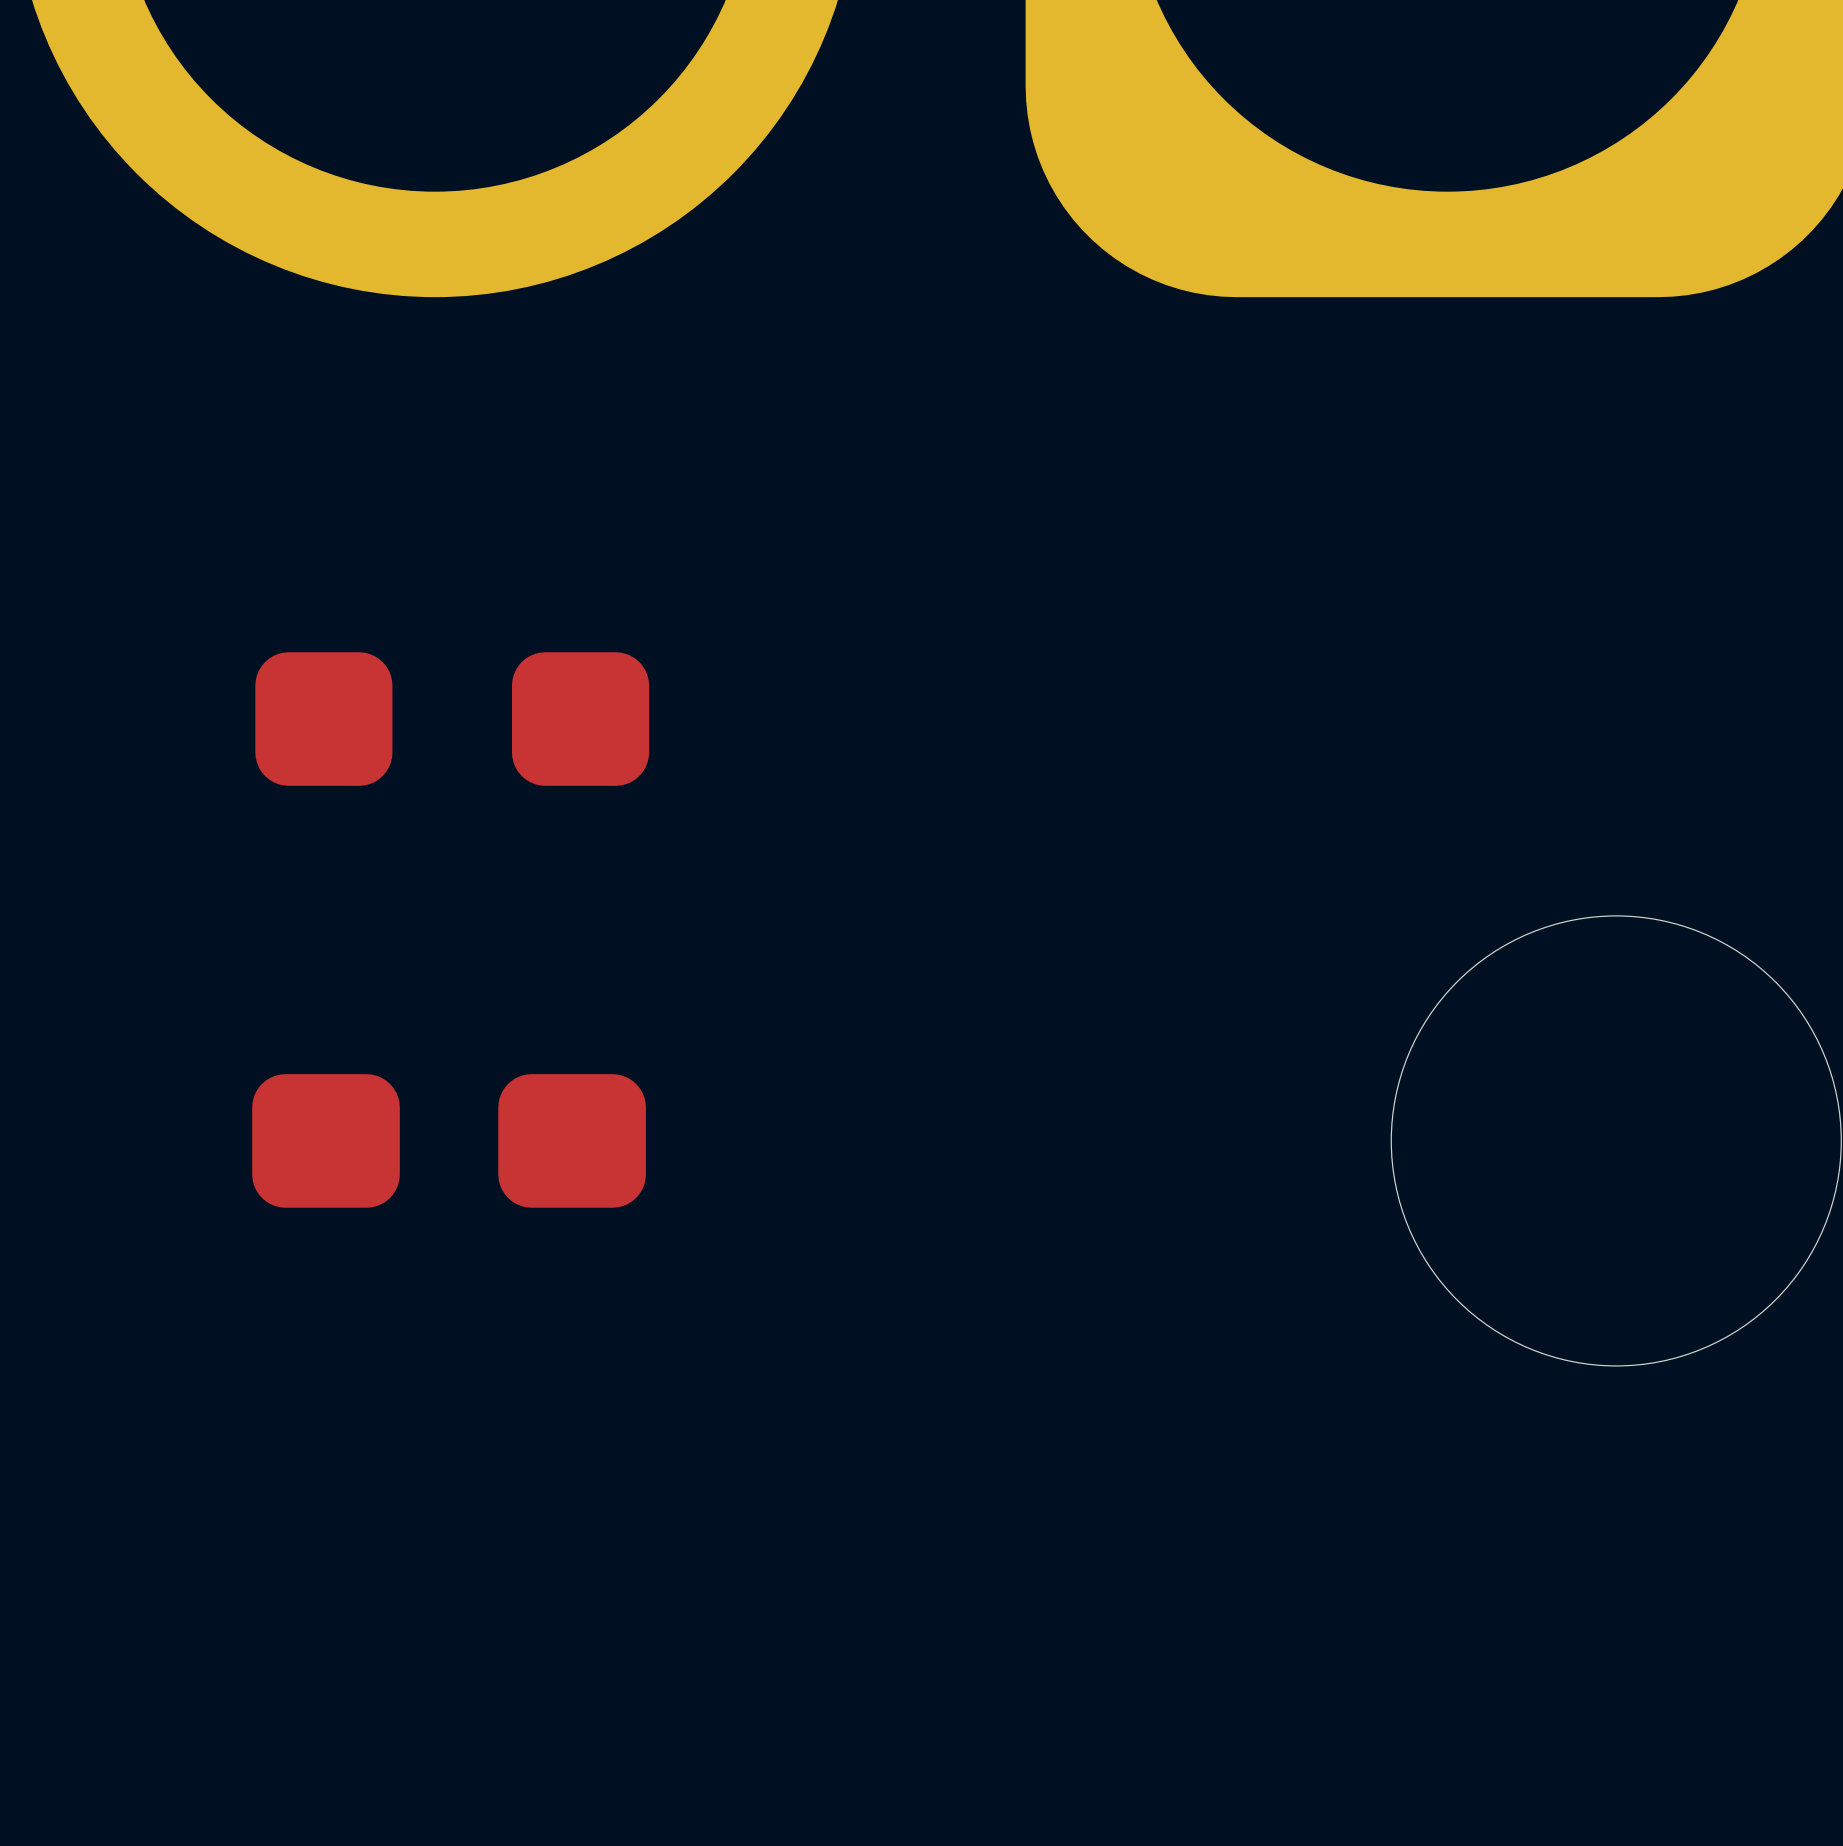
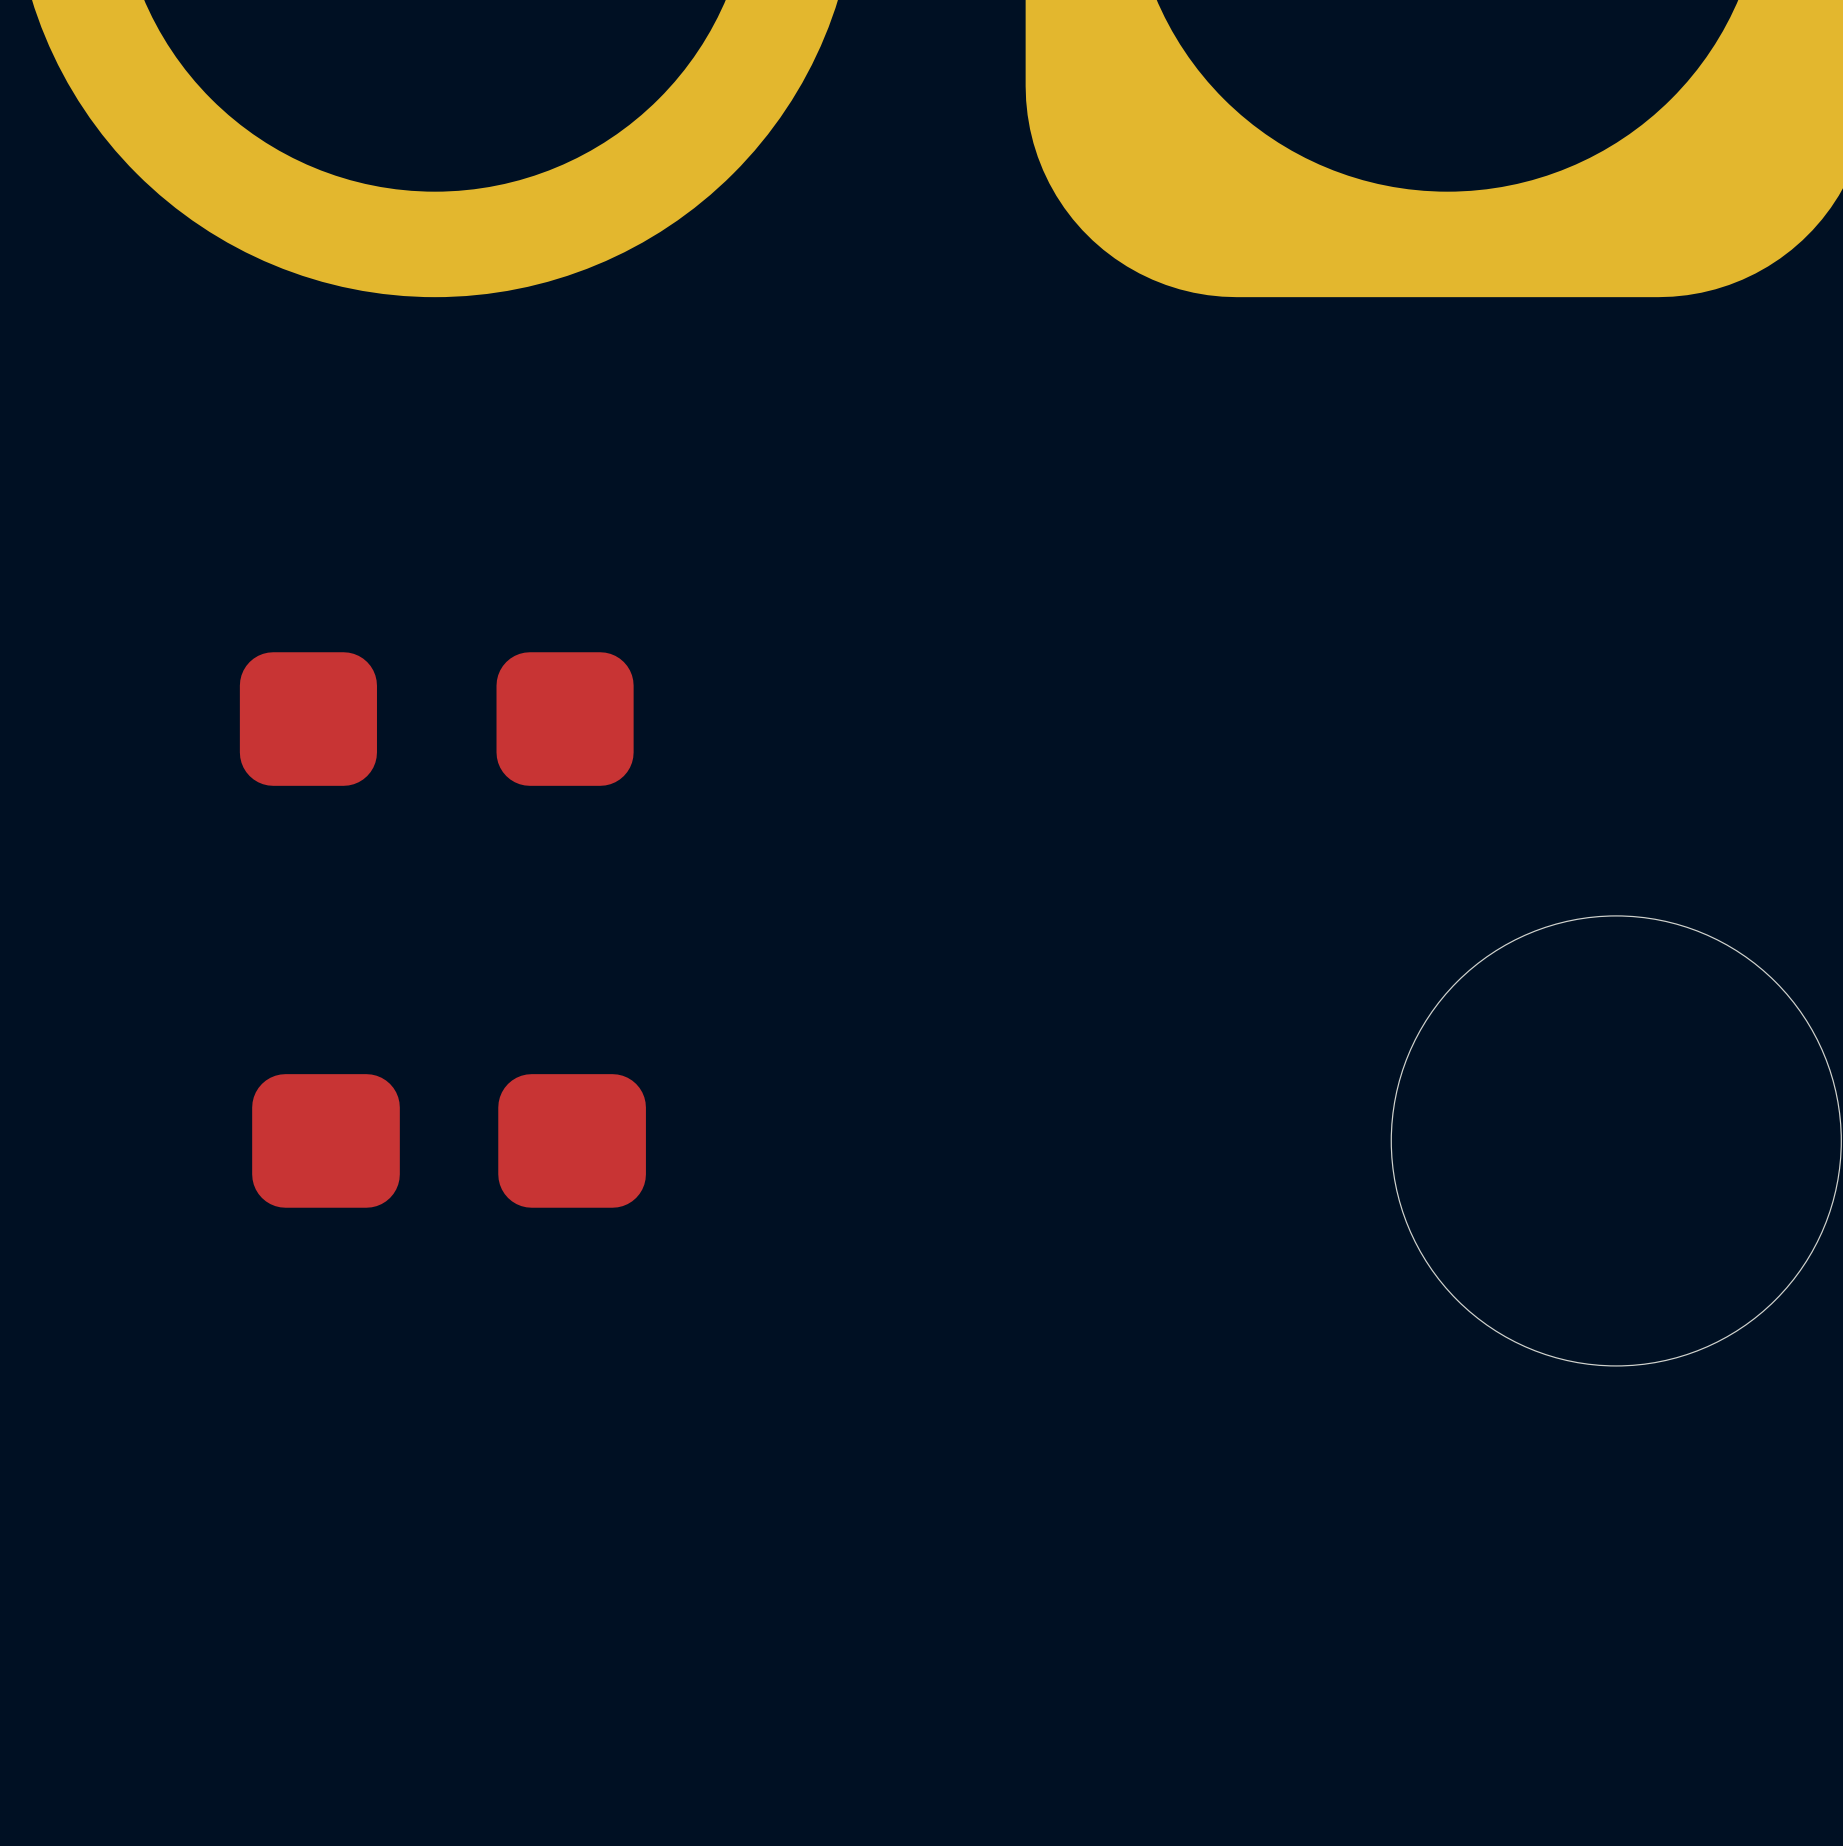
part position: (452, 719) -> (436, 719)

